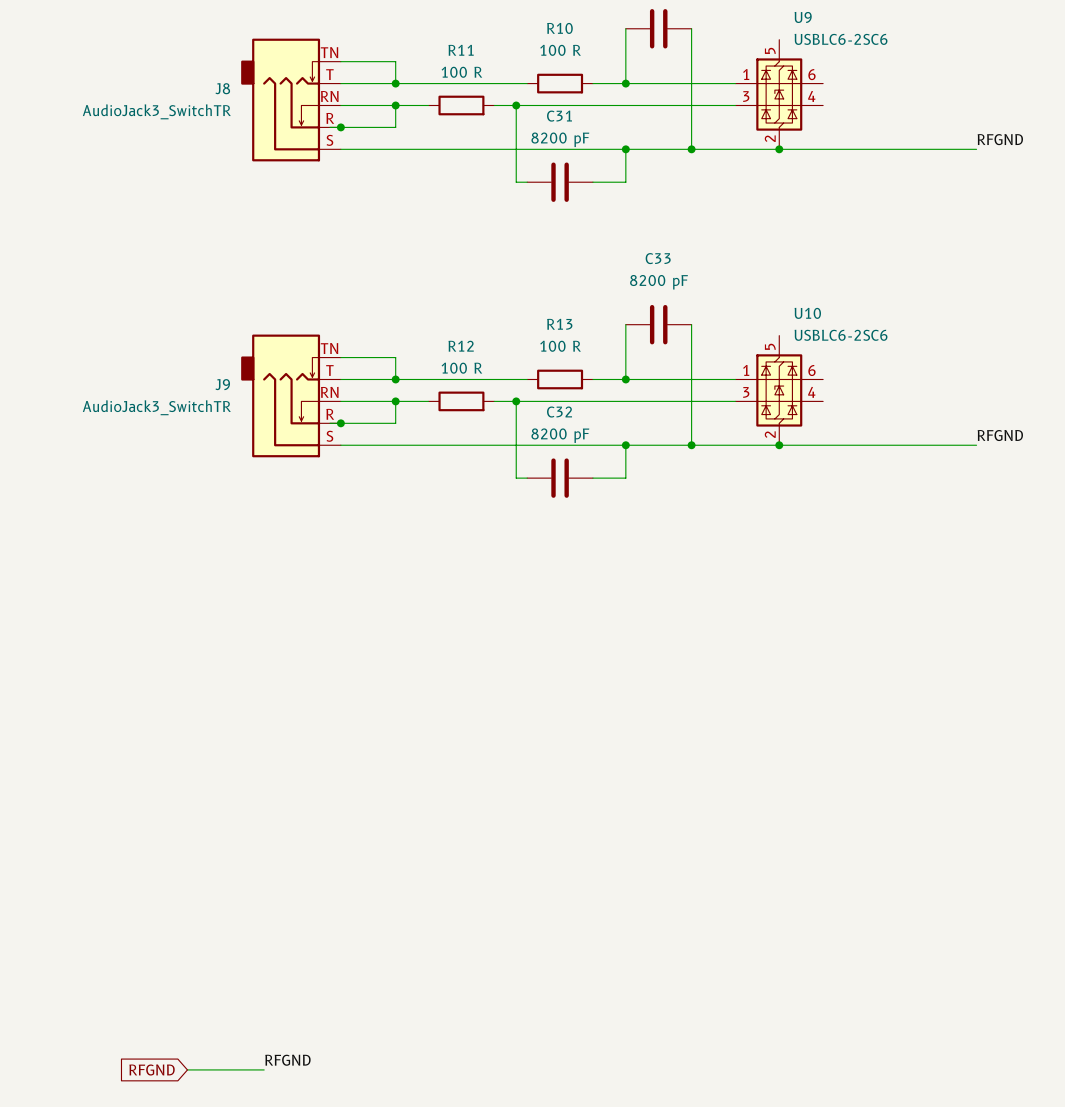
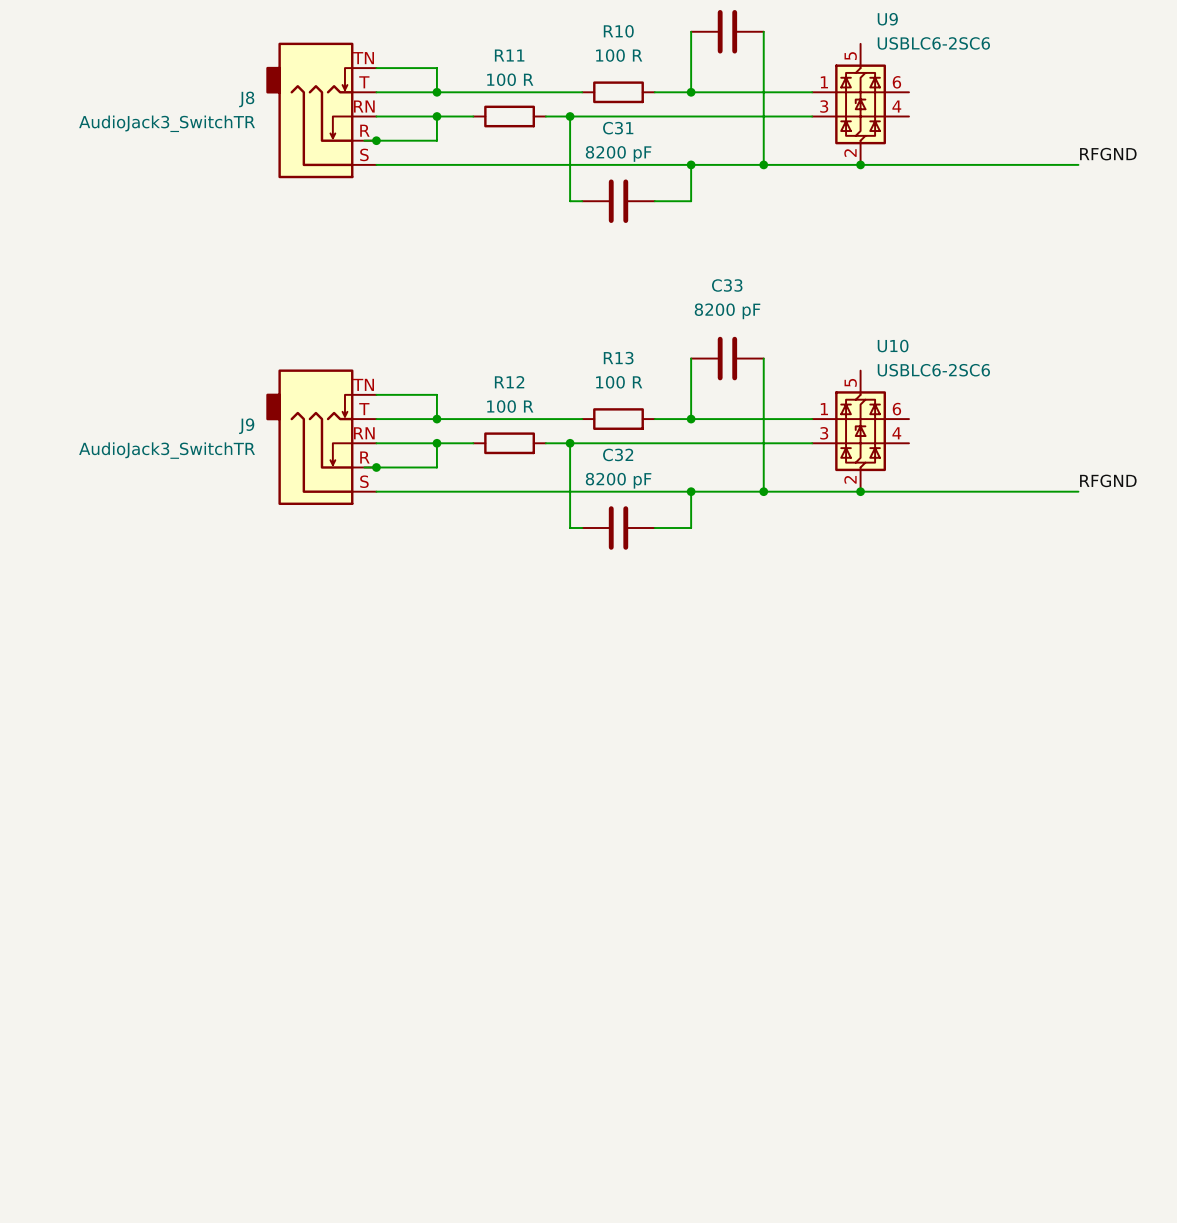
label: RFGND (287, 1060) -> none
wire: (187, 1069) (264, 1069) -> none
global label: RFGND (152, 1070) -> none

